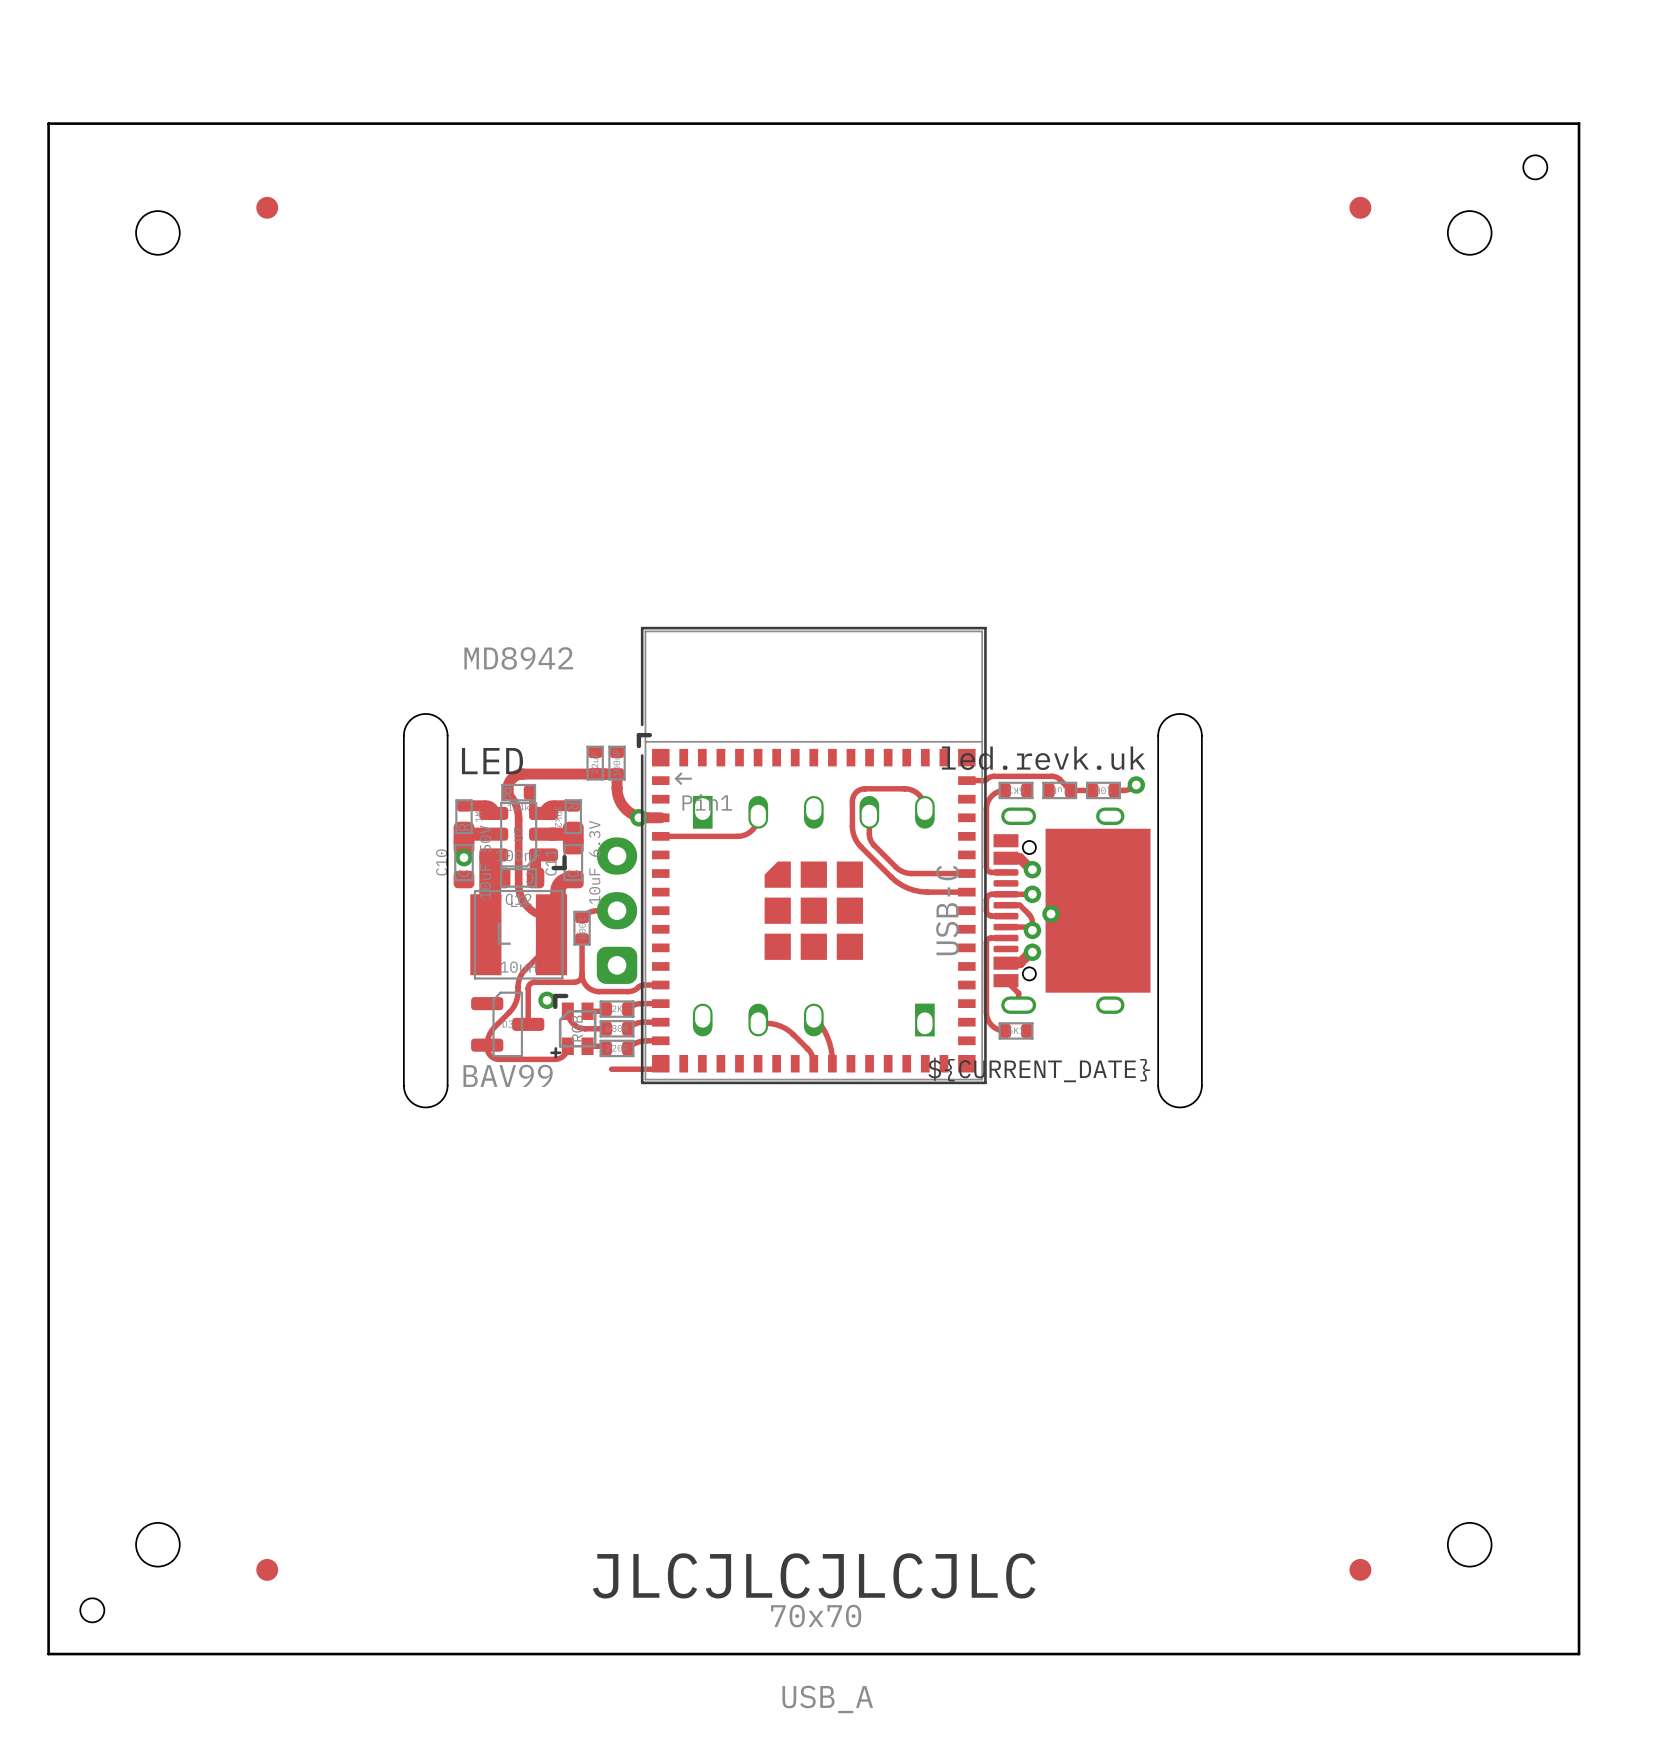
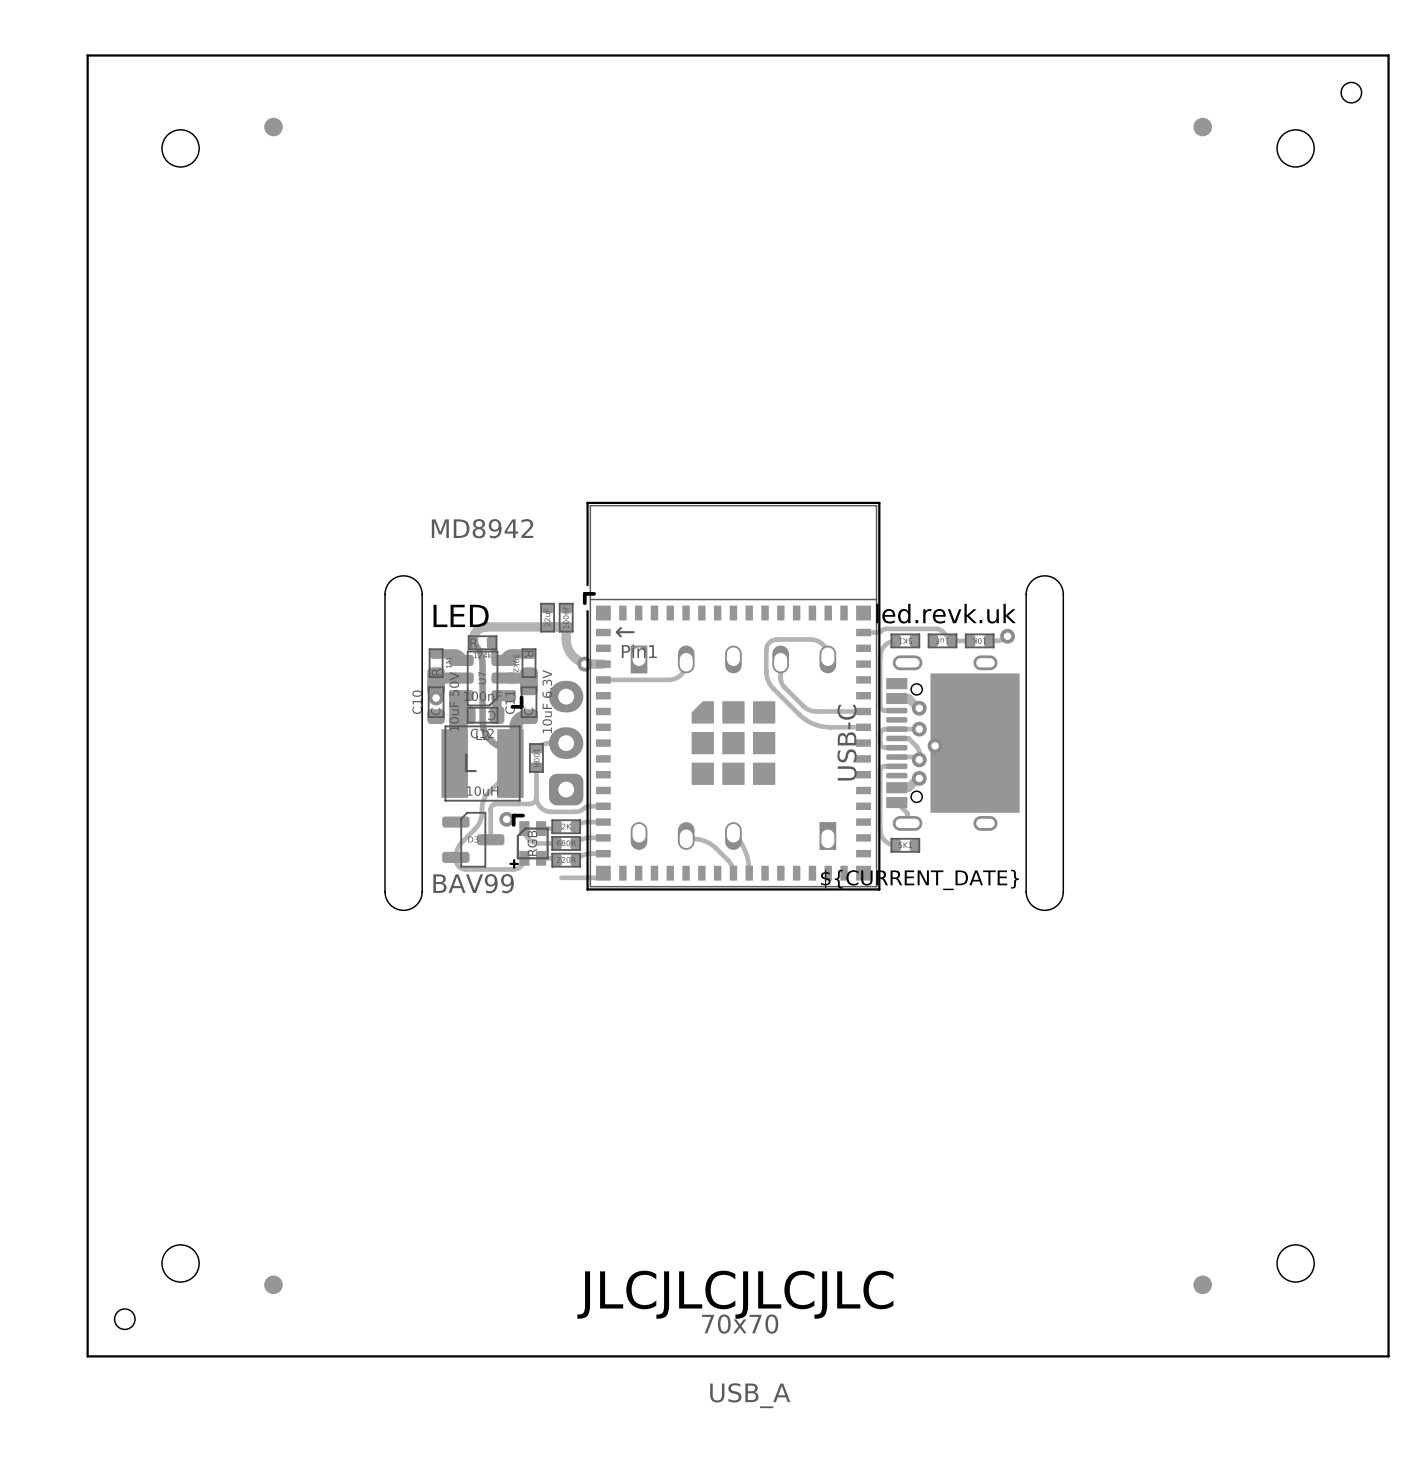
part position: (813, 888) -> (738, 705)
text position: USB_A (827, 1699) -> USB_A (750, 1395)

